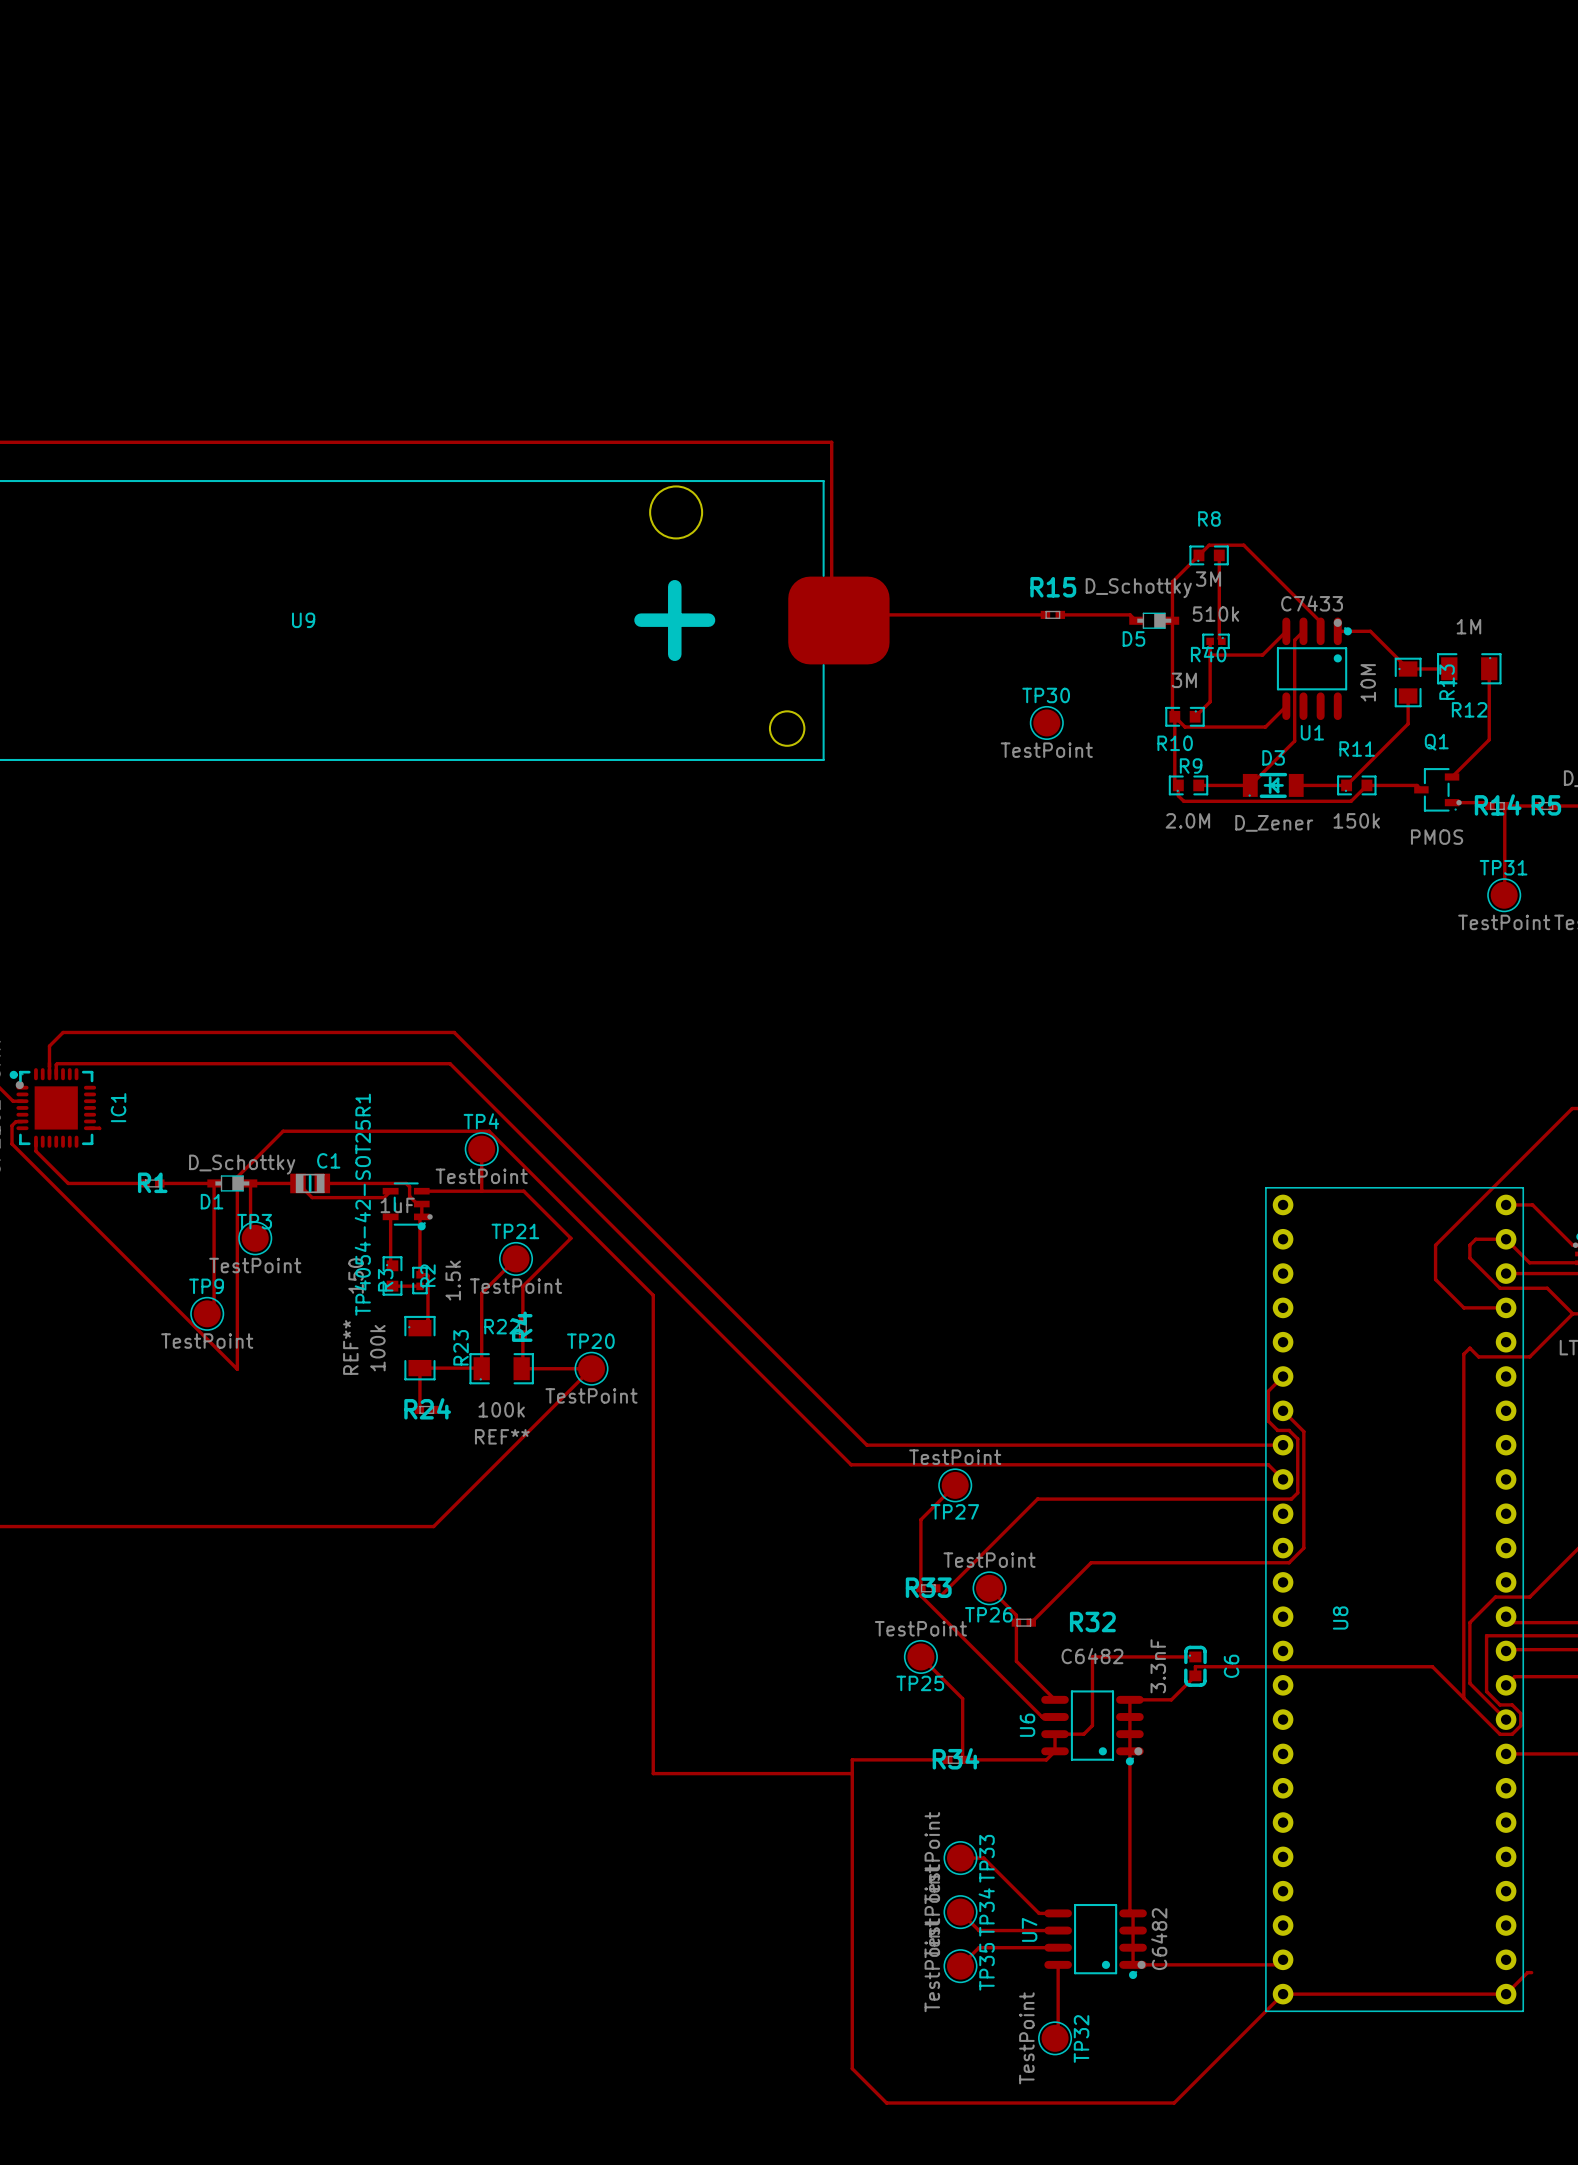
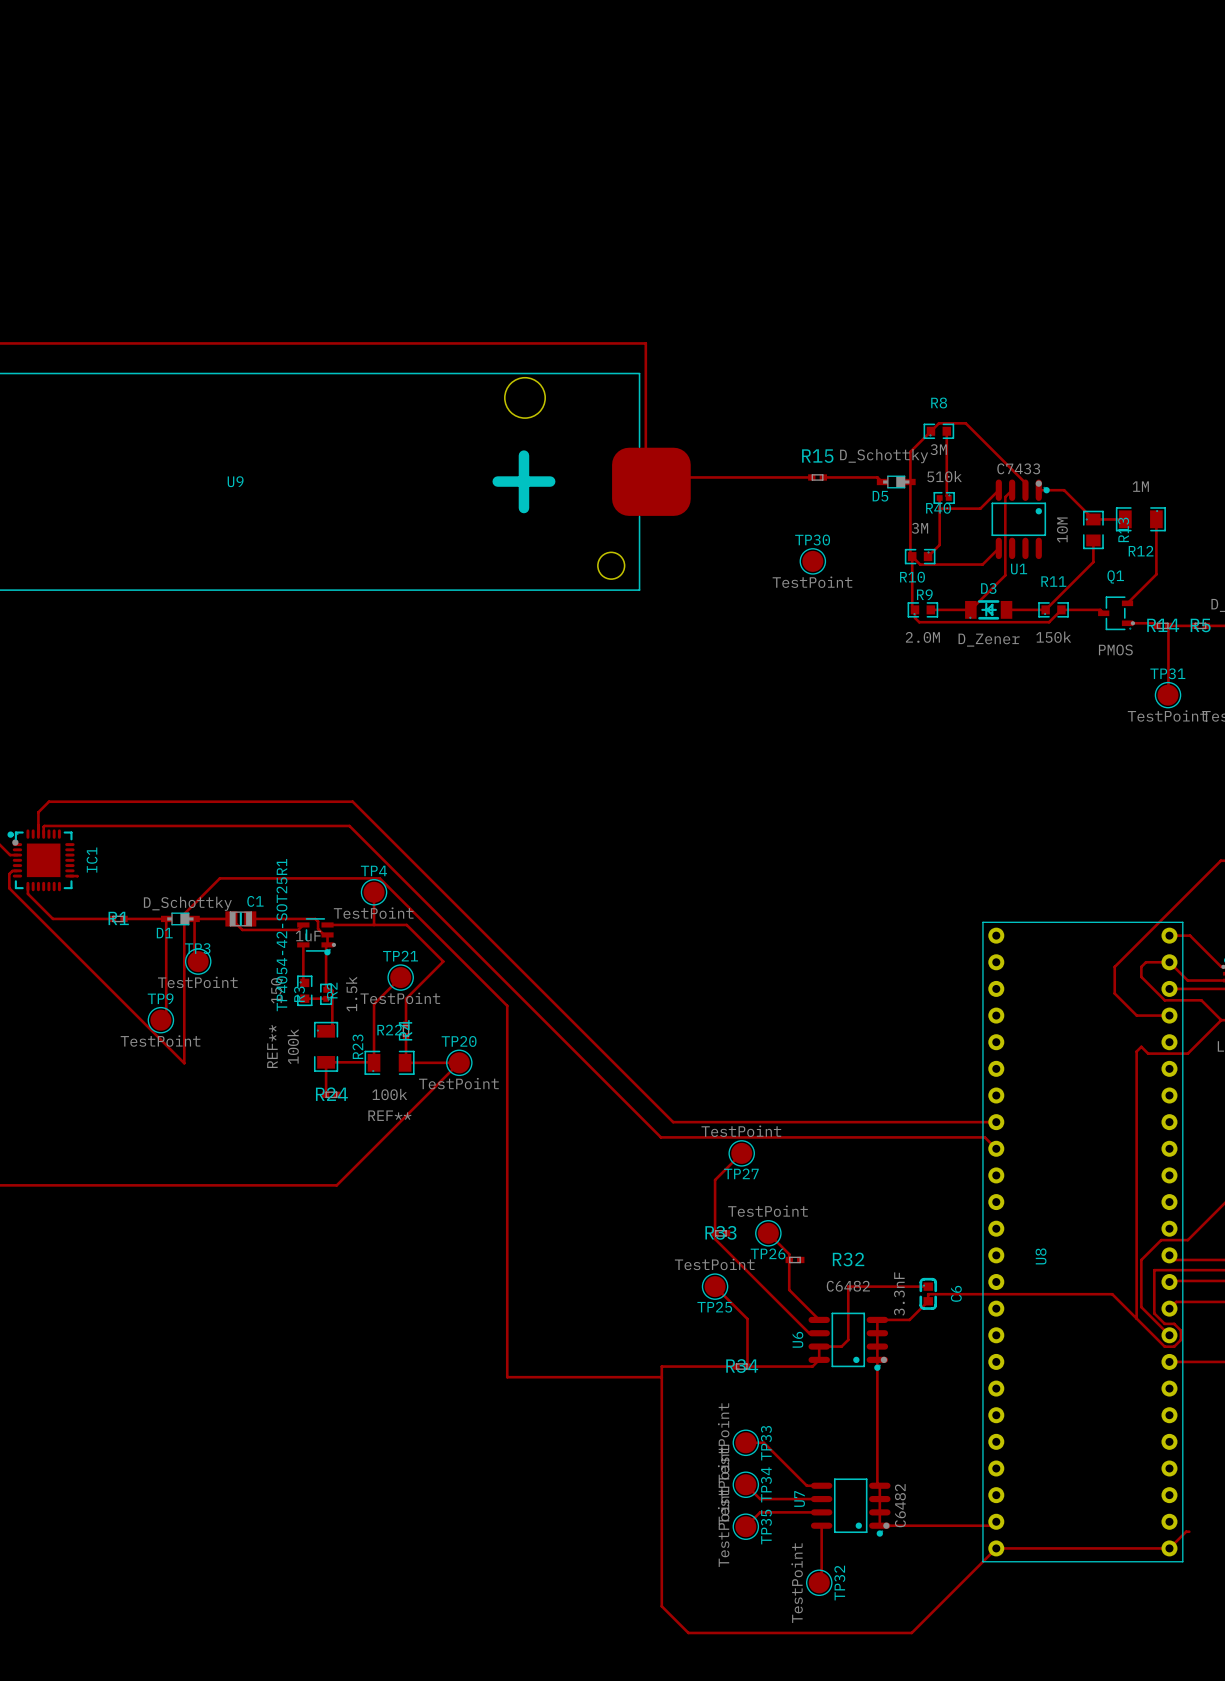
top track: (1283, 1376) (1268, 1391) (1268, 1421) (1277, 1430) (1289, 1430) (1297, 1439) (1297, 1492) (1291, 1499) (1037, 1499) (941, 1595) -> none
top track: (1283, 1410) (1303, 1431) (1303, 1548) (1289, 1562) (1091, 1562) (1031, 1622) -> none

